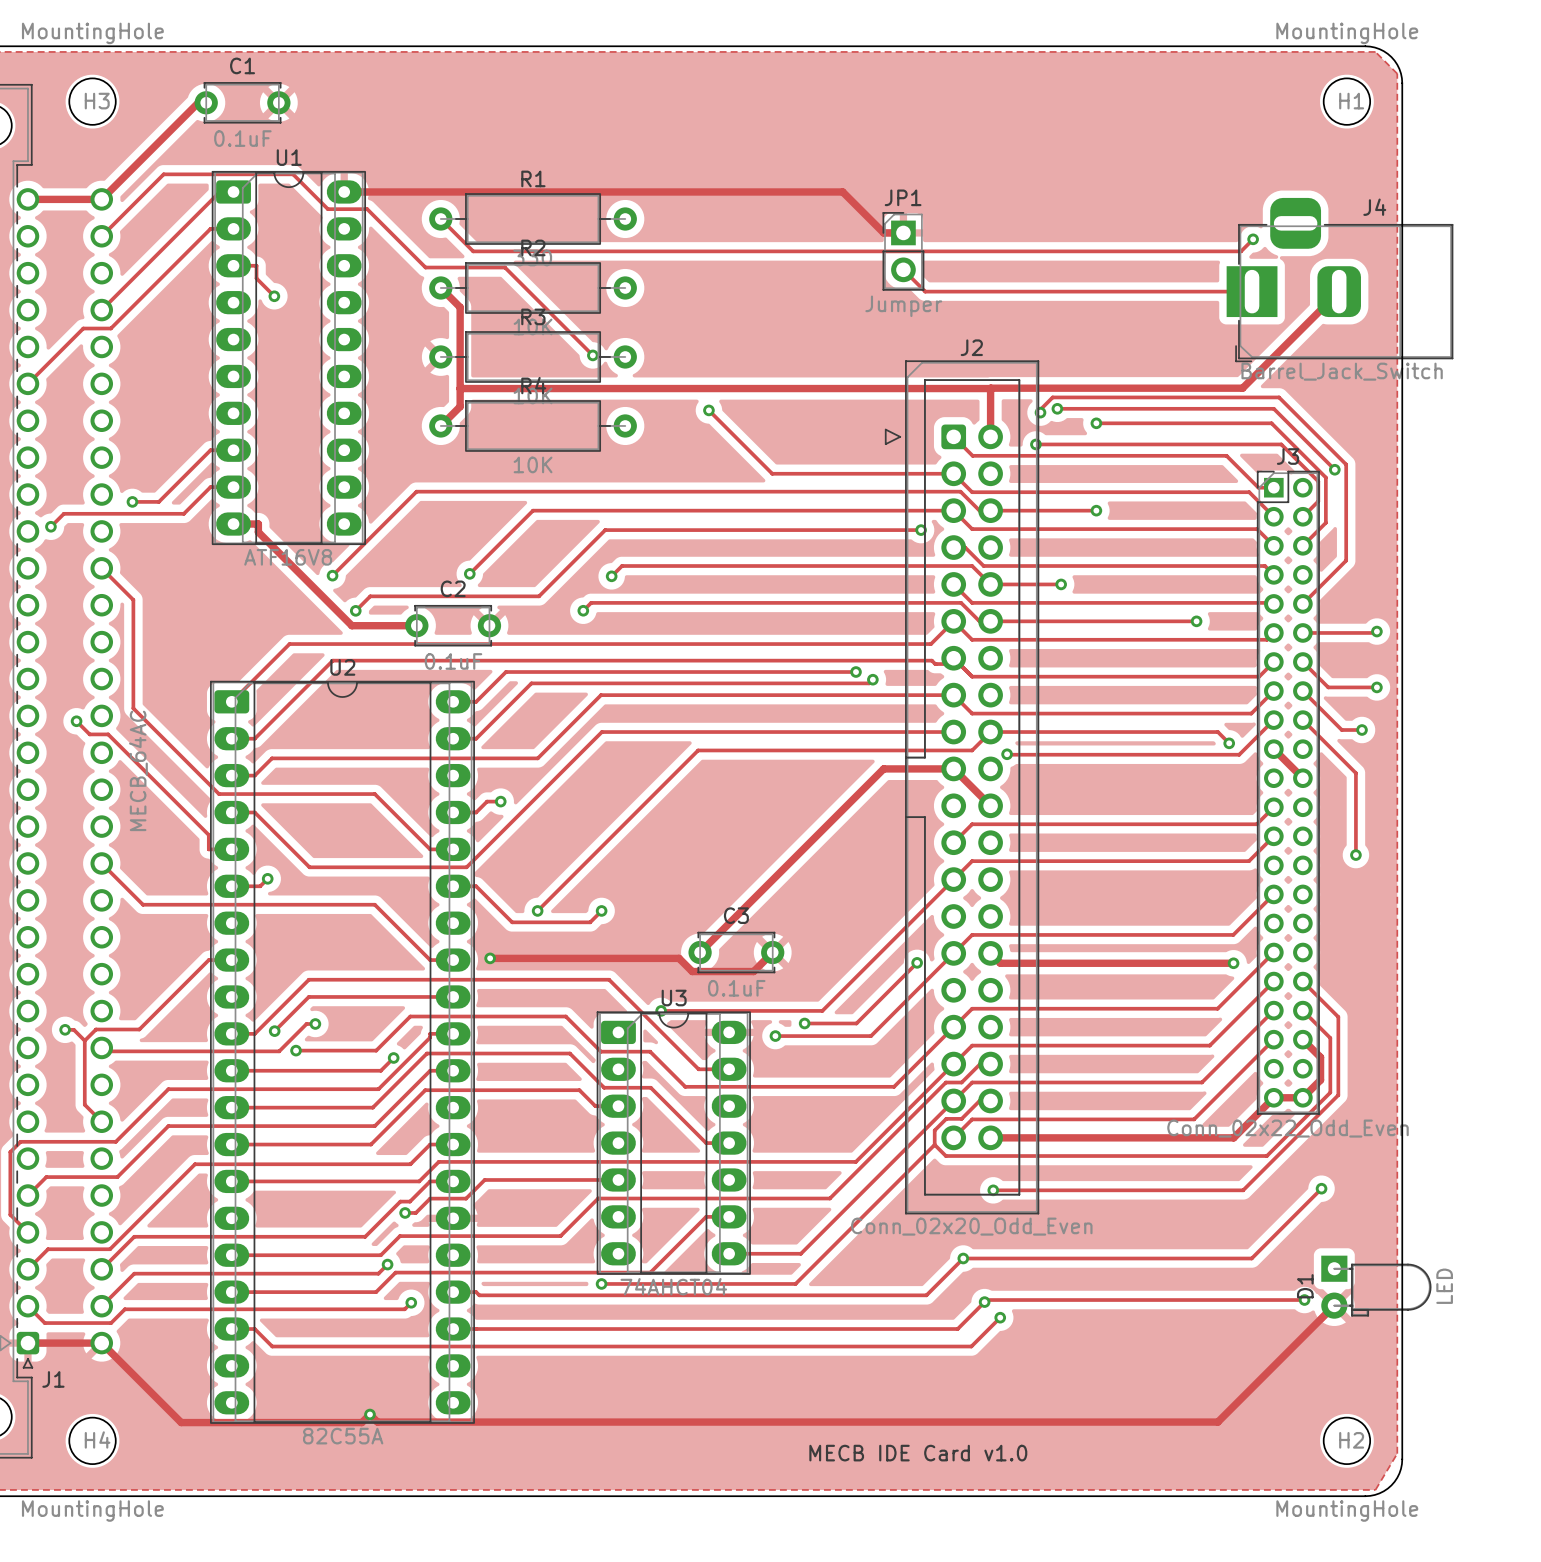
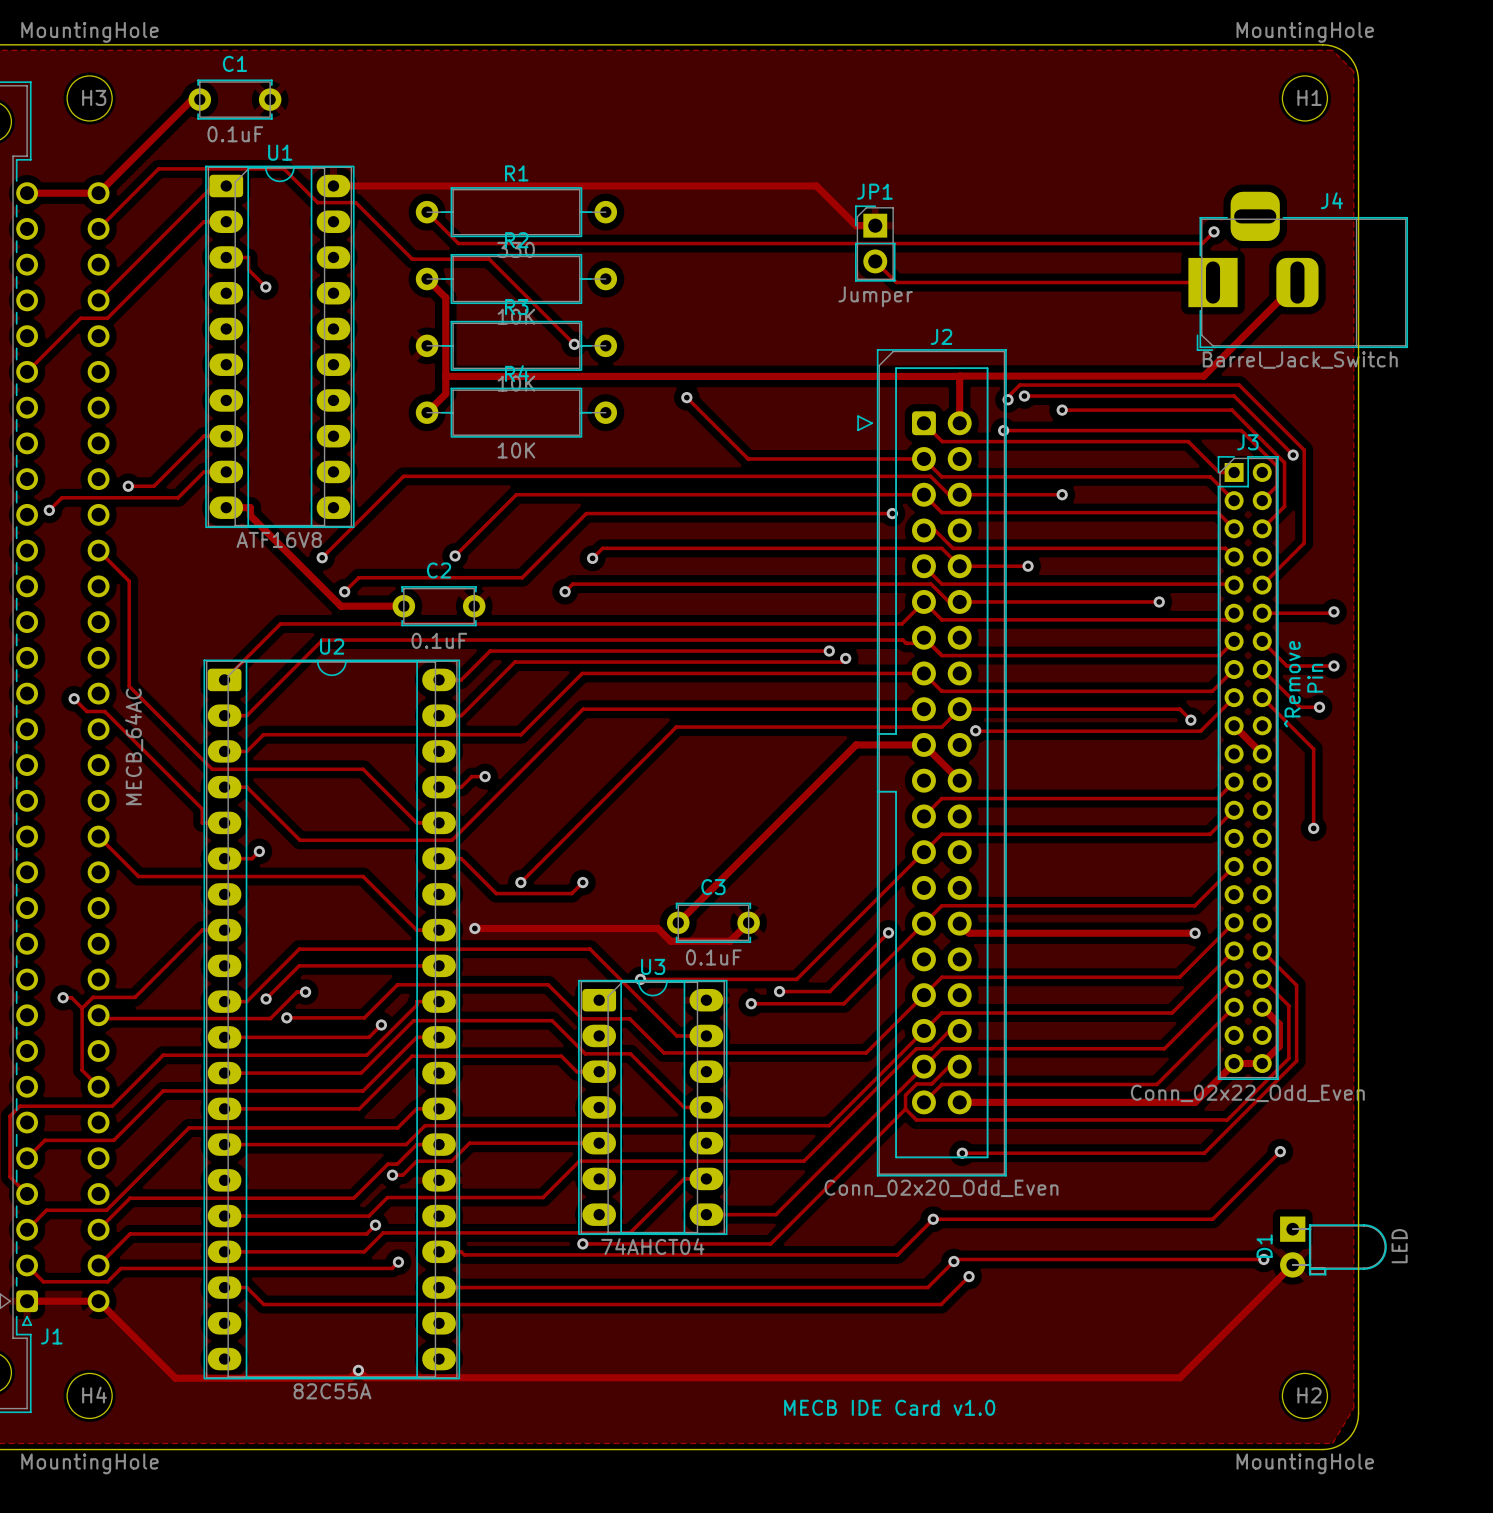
text: none -> Pin (1315, 678)
text: none -> ^Remove (1292, 684)

